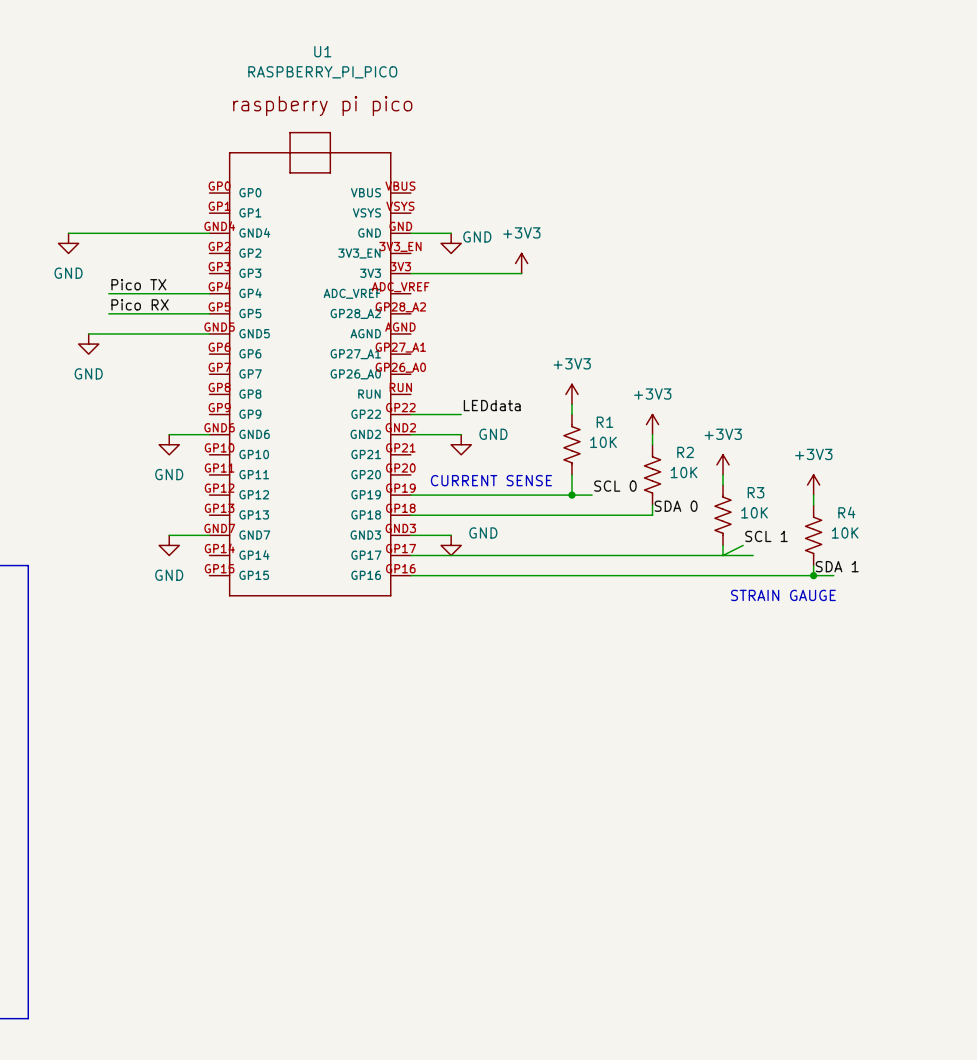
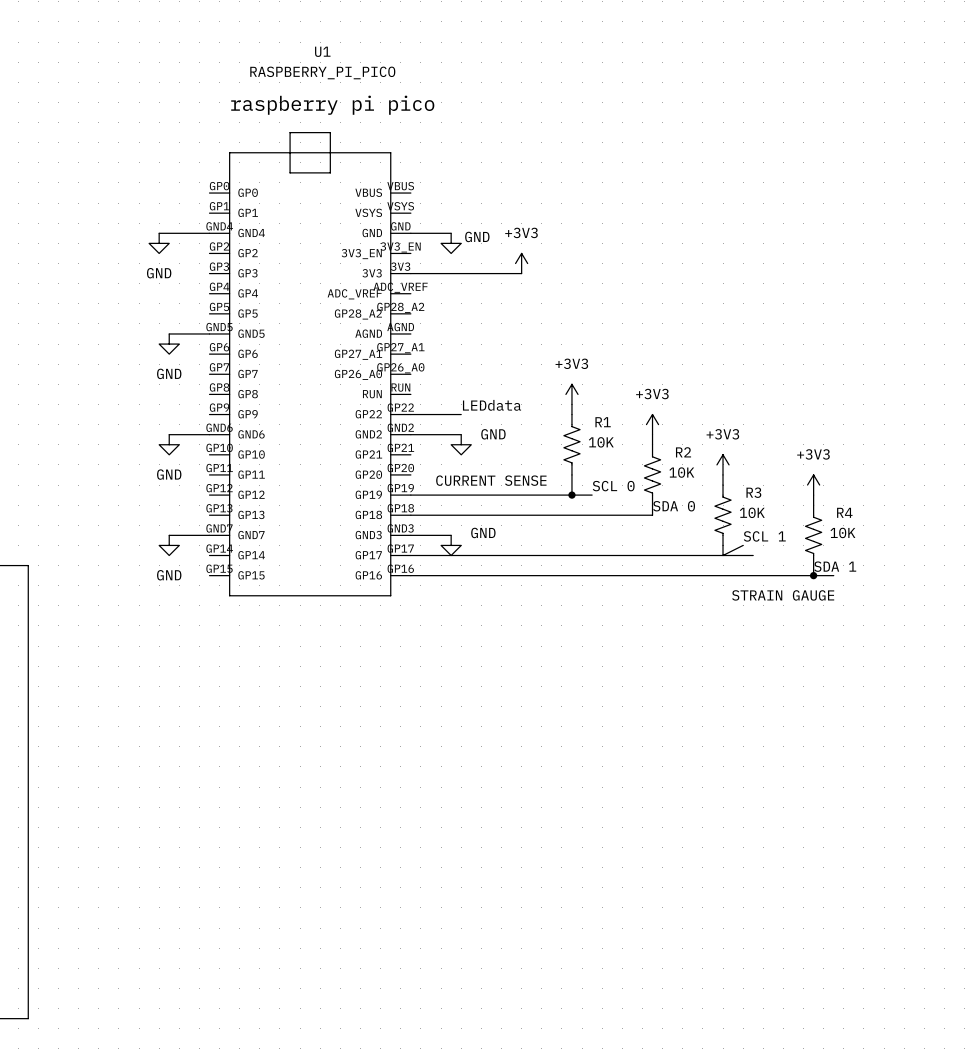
wire: (68, 233) (159, 233) -> none
power symbol: GND (68, 243) -> none
power symbol: none -> GND (159, 243)
label: Pico TX (138, 284) -> none
wire: (108, 293) (209, 293) -> none
label: Pico RX (140, 304) -> none
wire: (108, 313) (209, 313) -> none
wire: (88, 333) (169, 333) -> none
power symbol: GND (88, 344) -> none
power symbol: none -> GND (169, 344)

